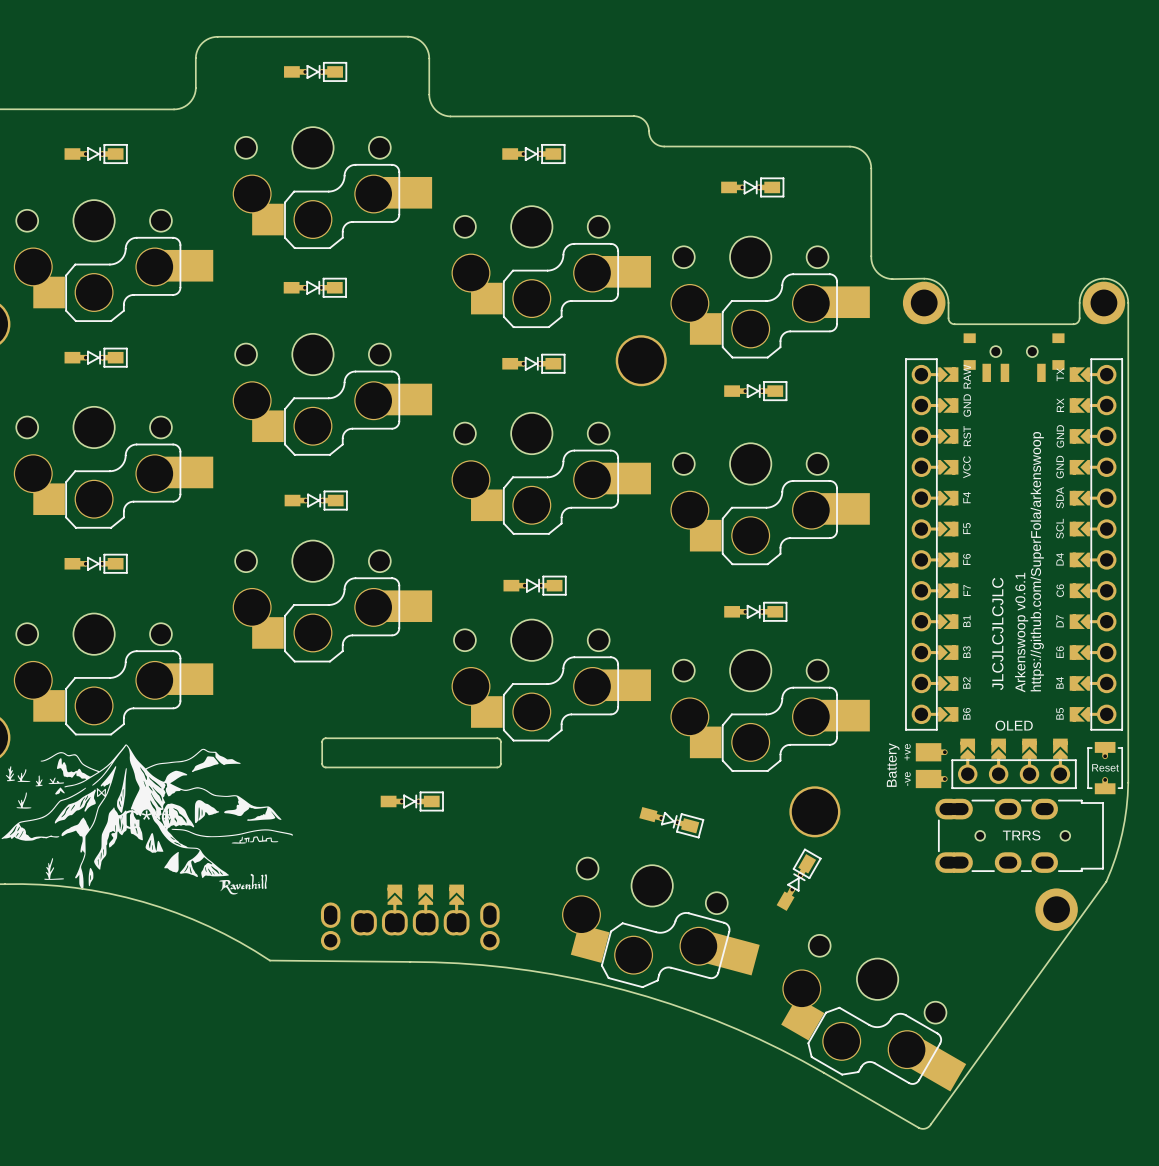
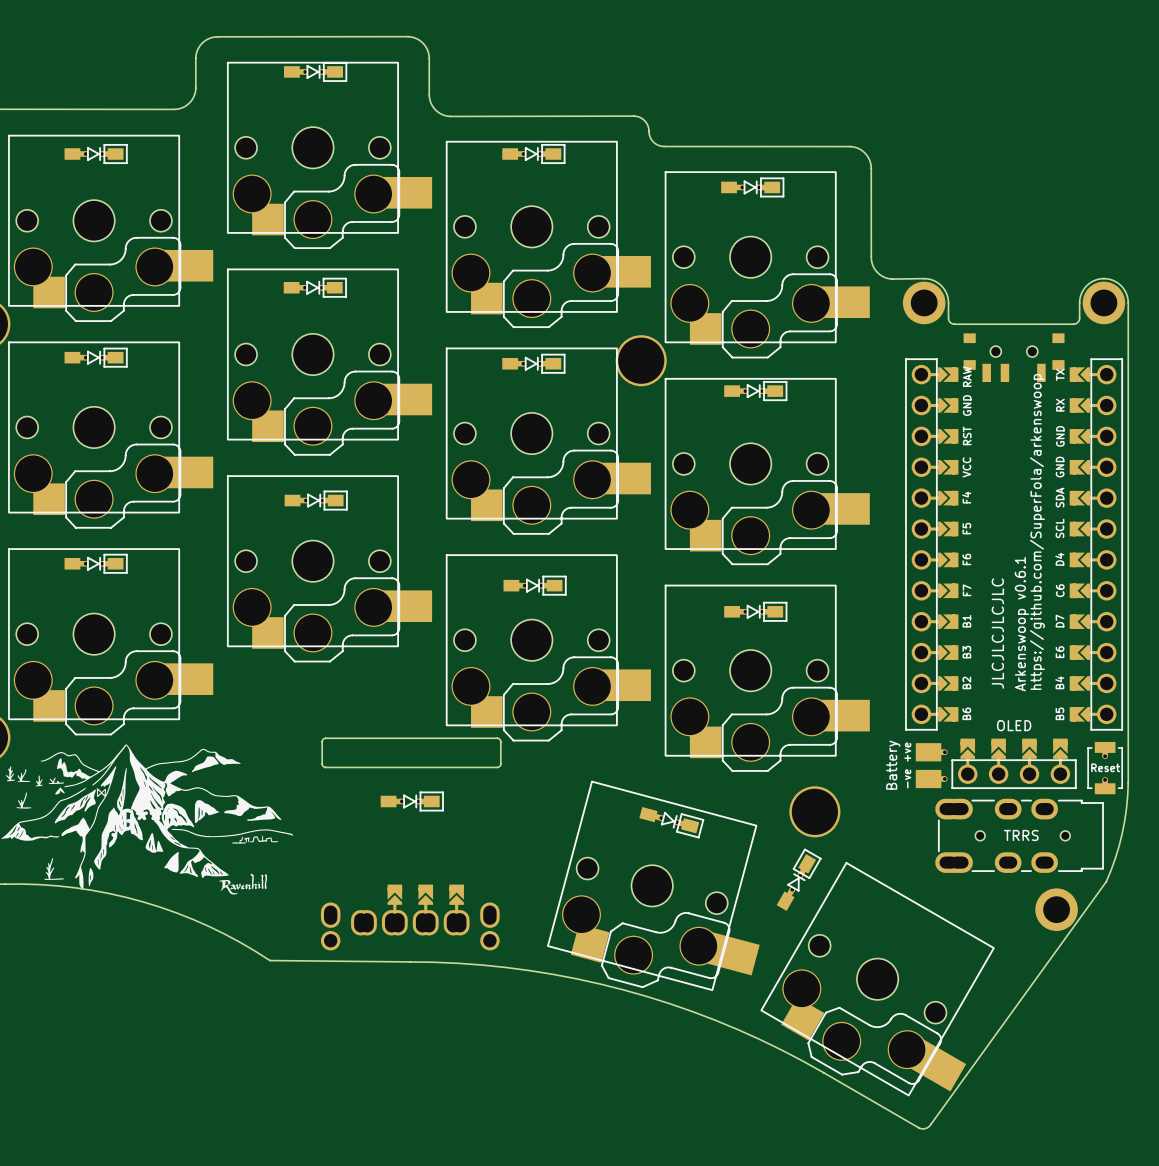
part: none -> (329, 155)
part: (332, 188) -> none
part: none -> (110, 228)
part: none -> (548, 234)
part: (113, 261) -> none
part: none -> (767, 264)
part: (551, 267) -> none
part: (770, 297) -> none
part: none -> (329, 362)
part: (332, 394) -> none
part: none -> (110, 435)
part: none -> (548, 441)
part: (113, 467) -> none
part: none -> (767, 471)
part: (551, 473) -> none
part: (770, 504) -> none
part: none -> (329, 568)
part: (332, 601) -> none
part: none -> (110, 641)
part: none -> (548, 647)
part: (113, 674) -> none
part: none -> (767, 678)
part: (551, 680) -> none
part: (770, 710) -> none
part: none -> (653, 885)
part: (660, 922) -> none
part: none -> (877, 979)
part: (873, 1013) -> none

